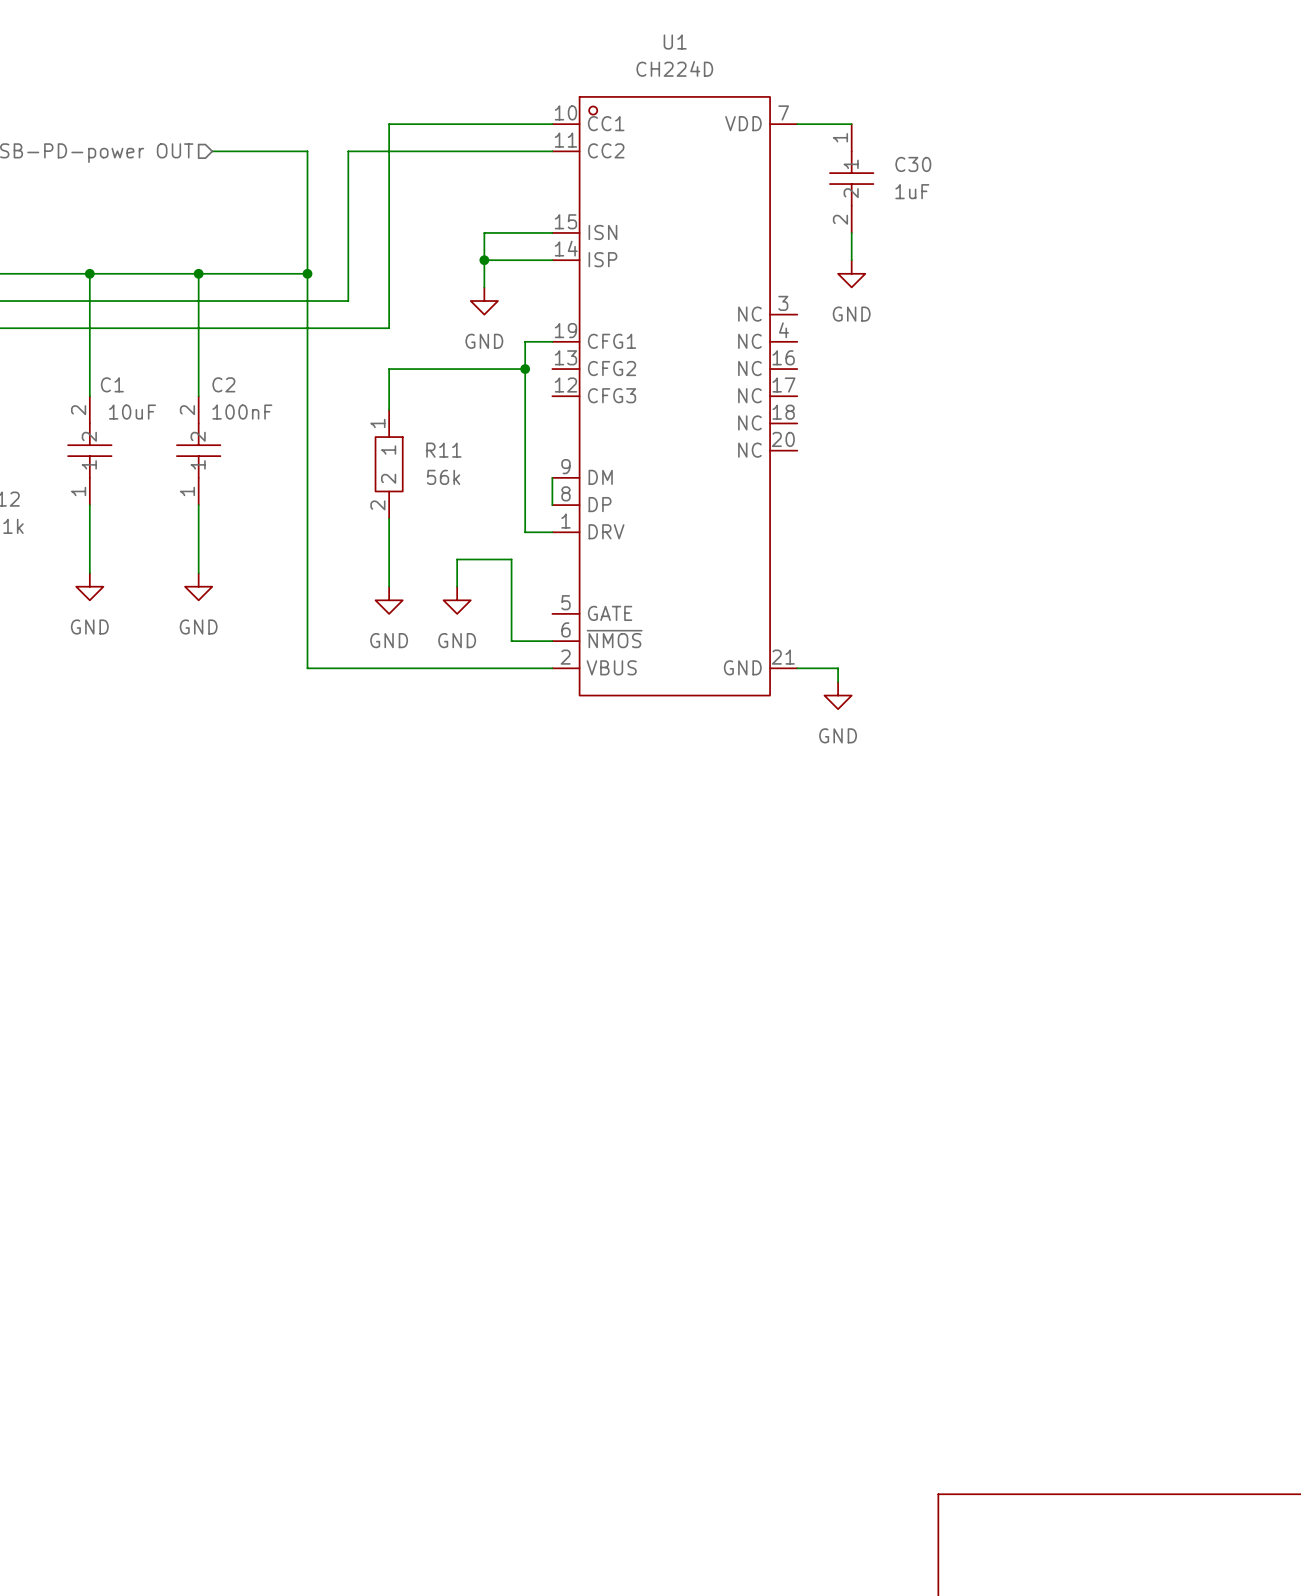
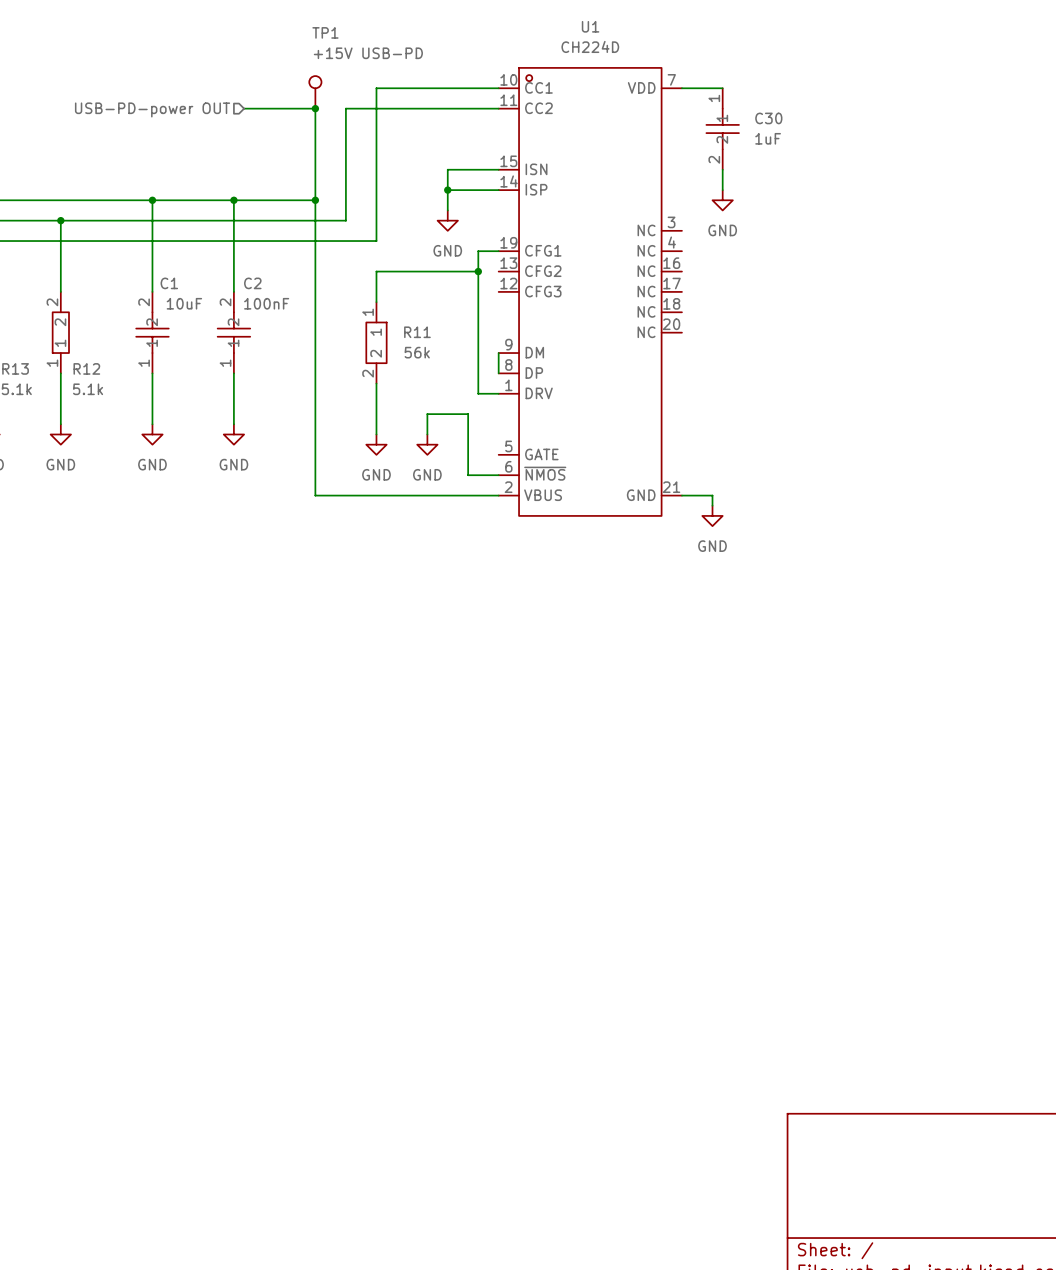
TP1: none -> +15V USB-PD (315, 92)
junction: none -> (315, 108)

